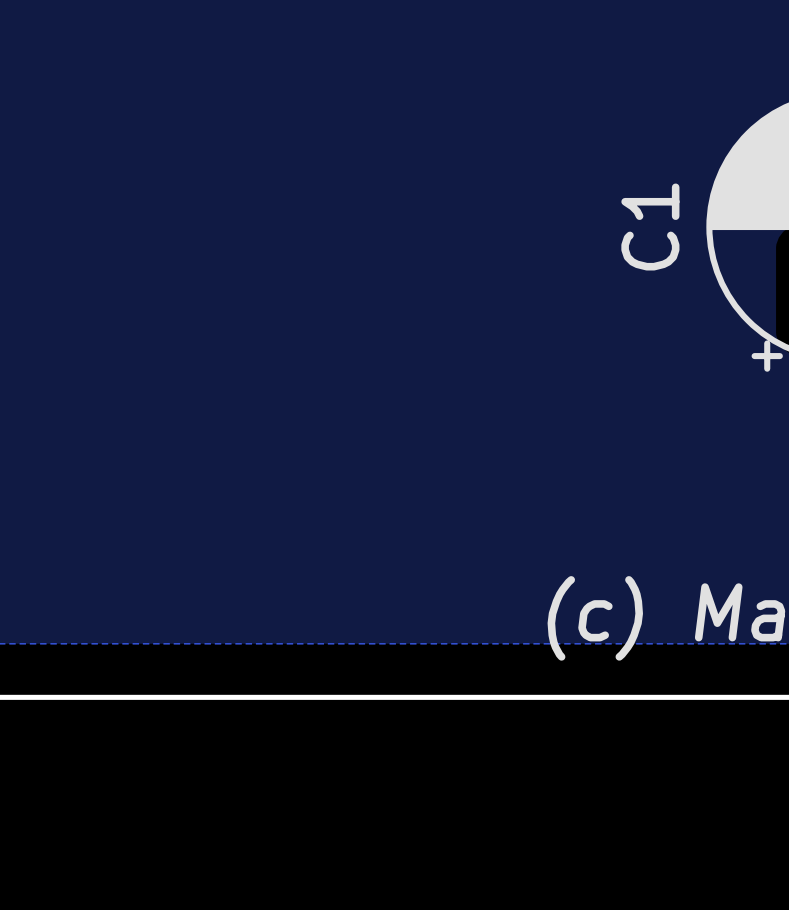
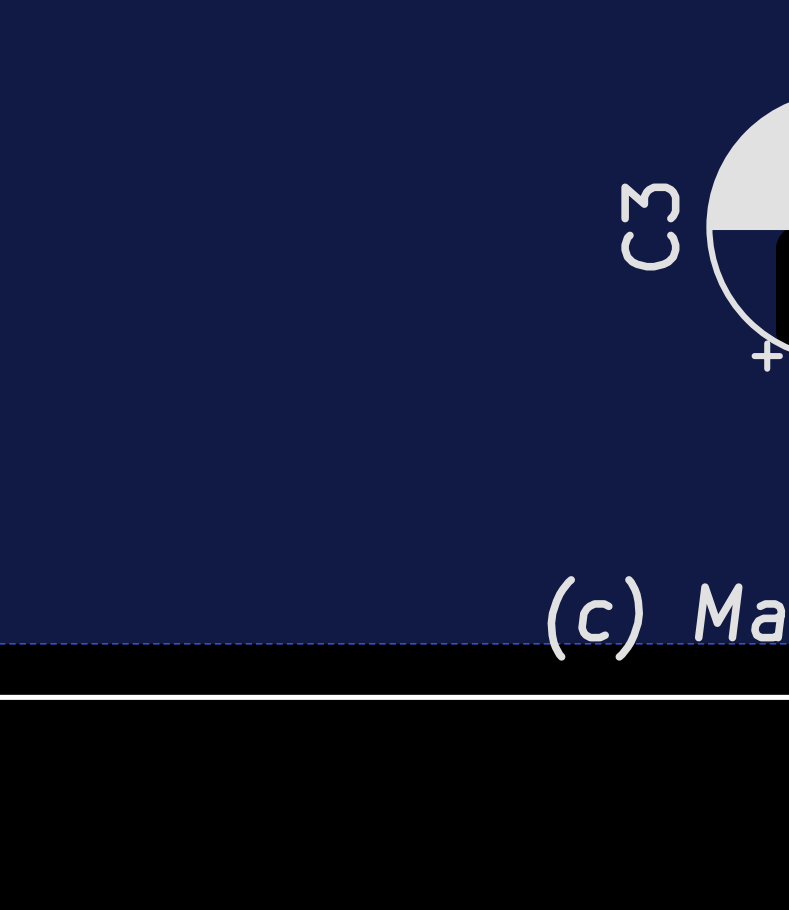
C1 name: C1 (650, 227) -> C3 (650, 227)

